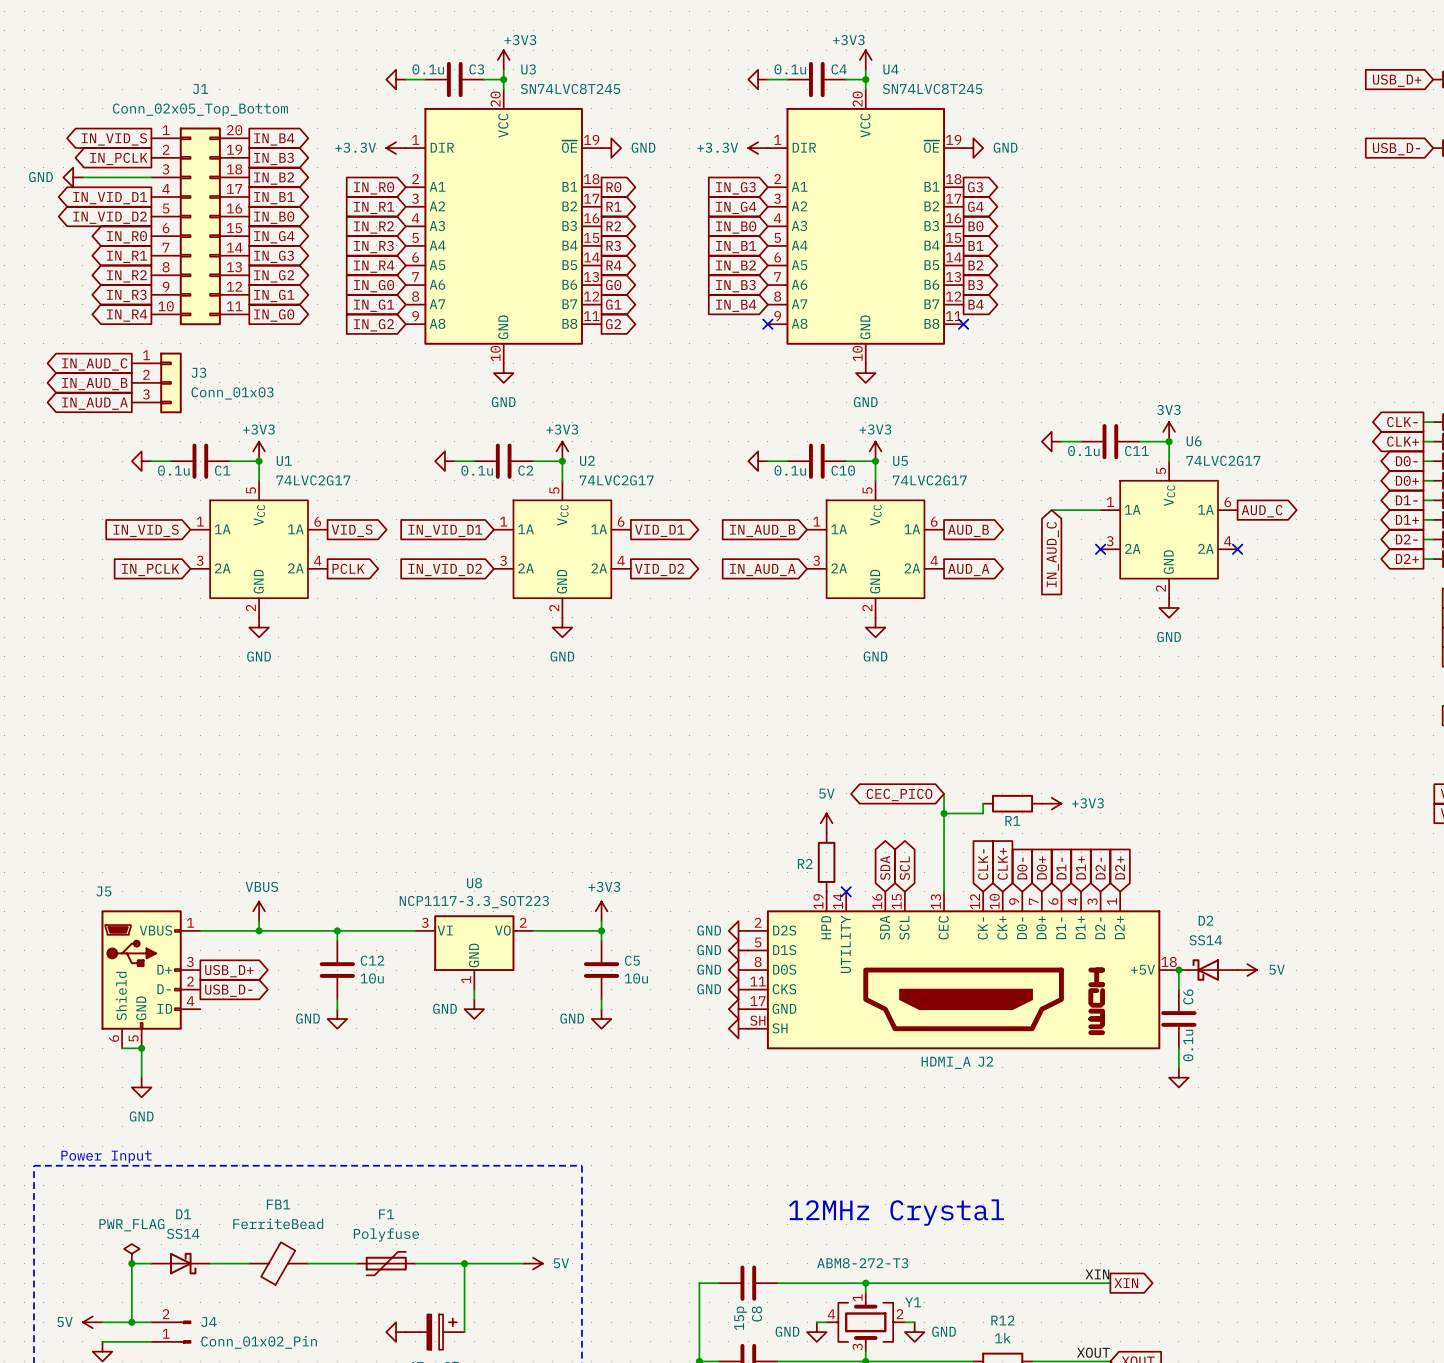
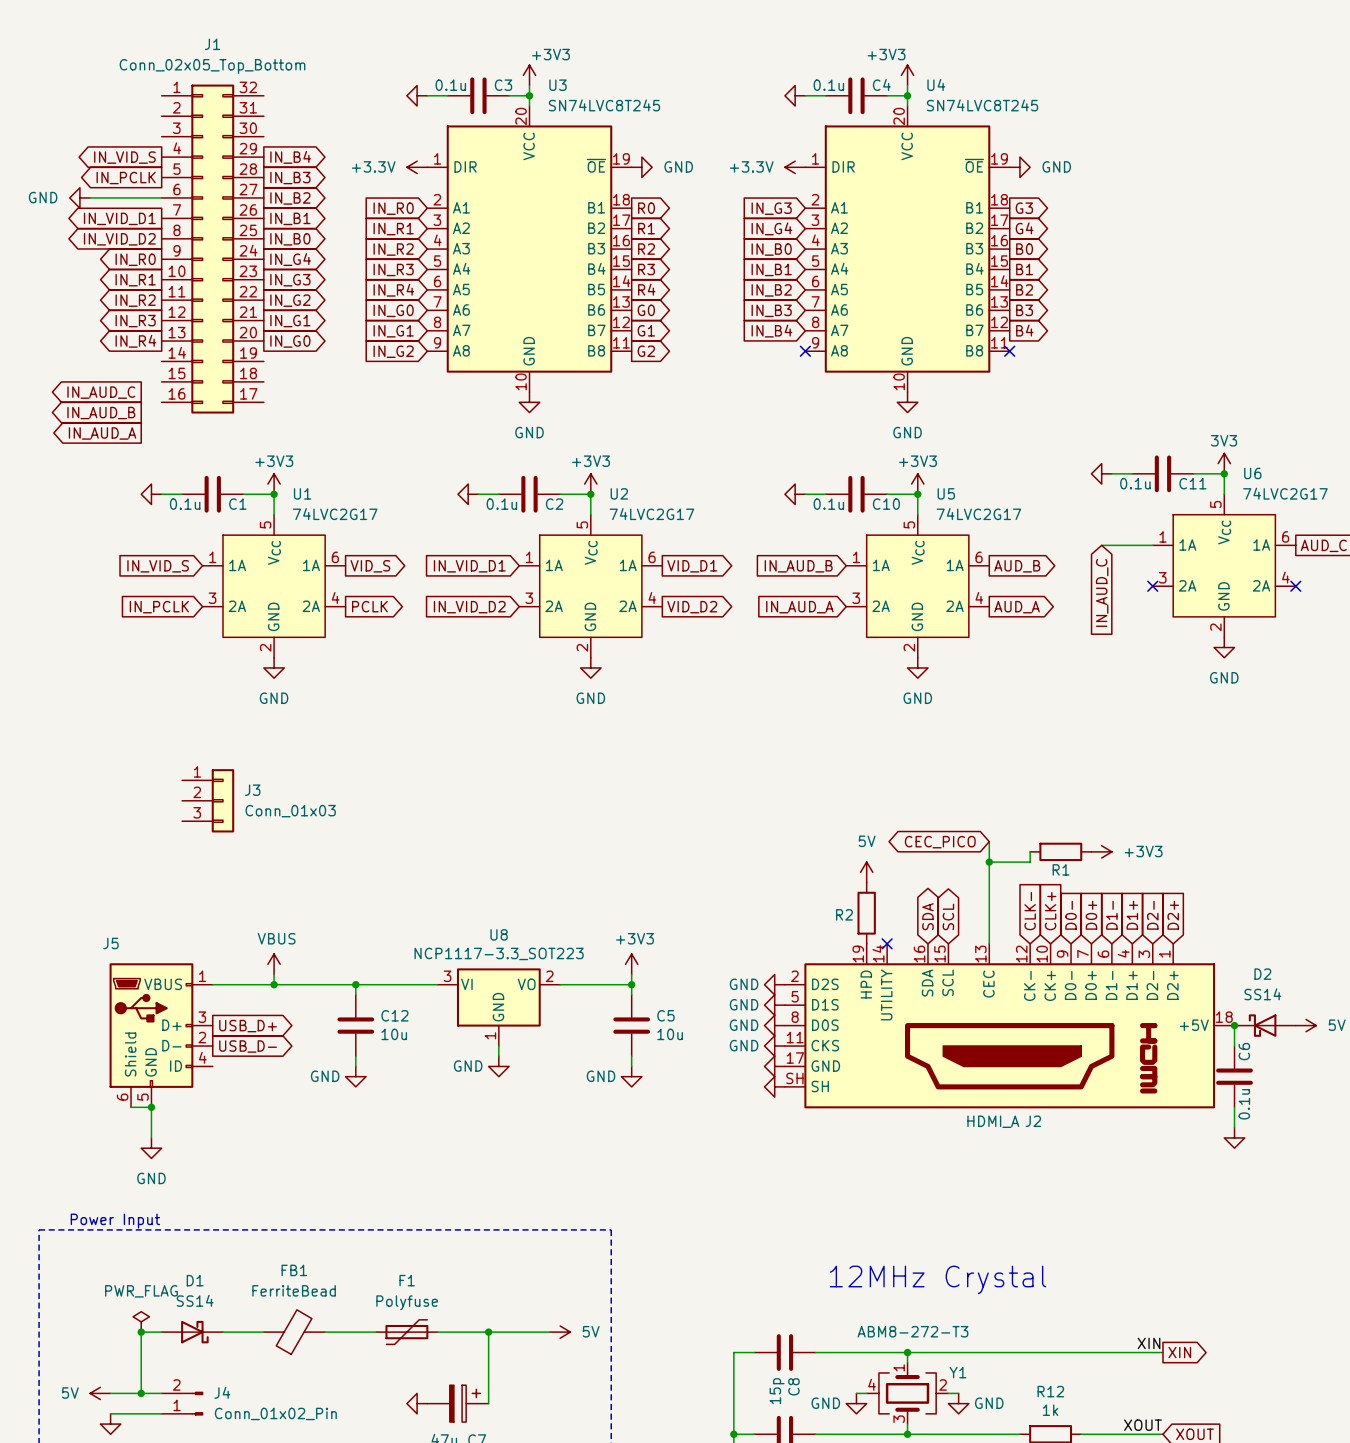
J1 name position: J1 (200, 89) -> J1 (212, 44)
J1 value position: Conn_02x05_Top_Bottom (200, 109) -> Conn_02x05_Top_Bottom (212, 66)
J1 symbol: [151, 127, 250, 326] -> [161, 84, 264, 414]
J3 position: (156, 382) -> (208, 800)

